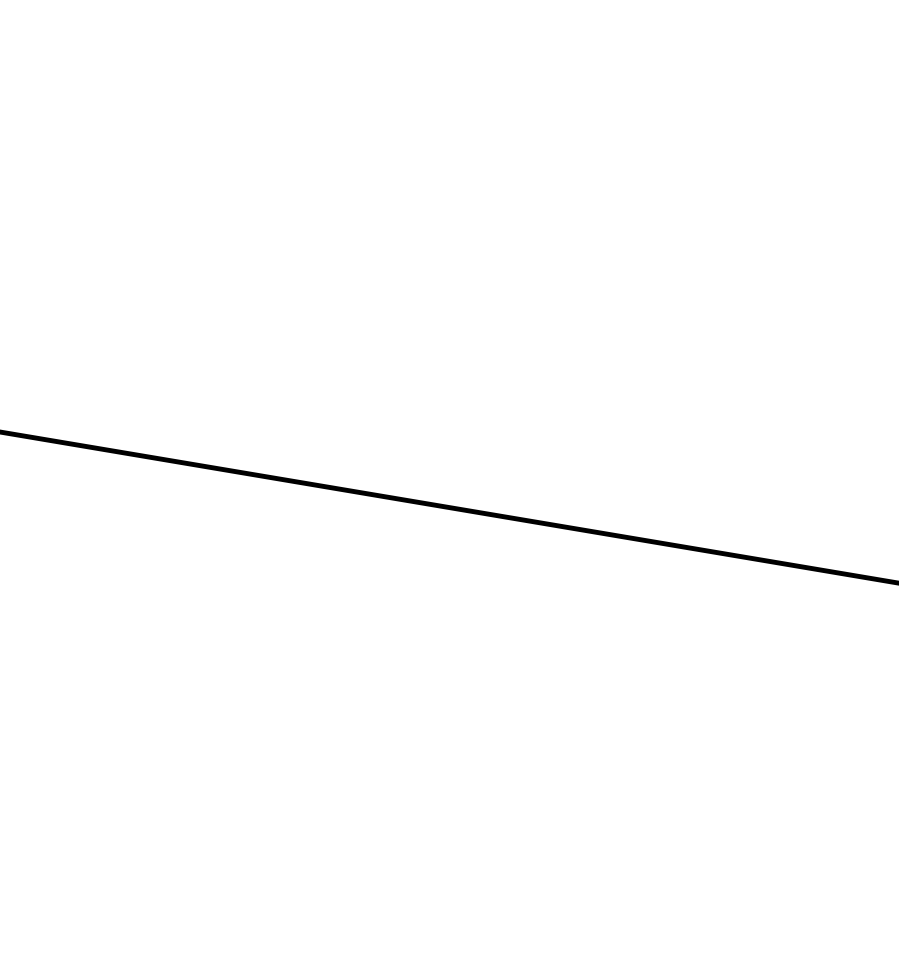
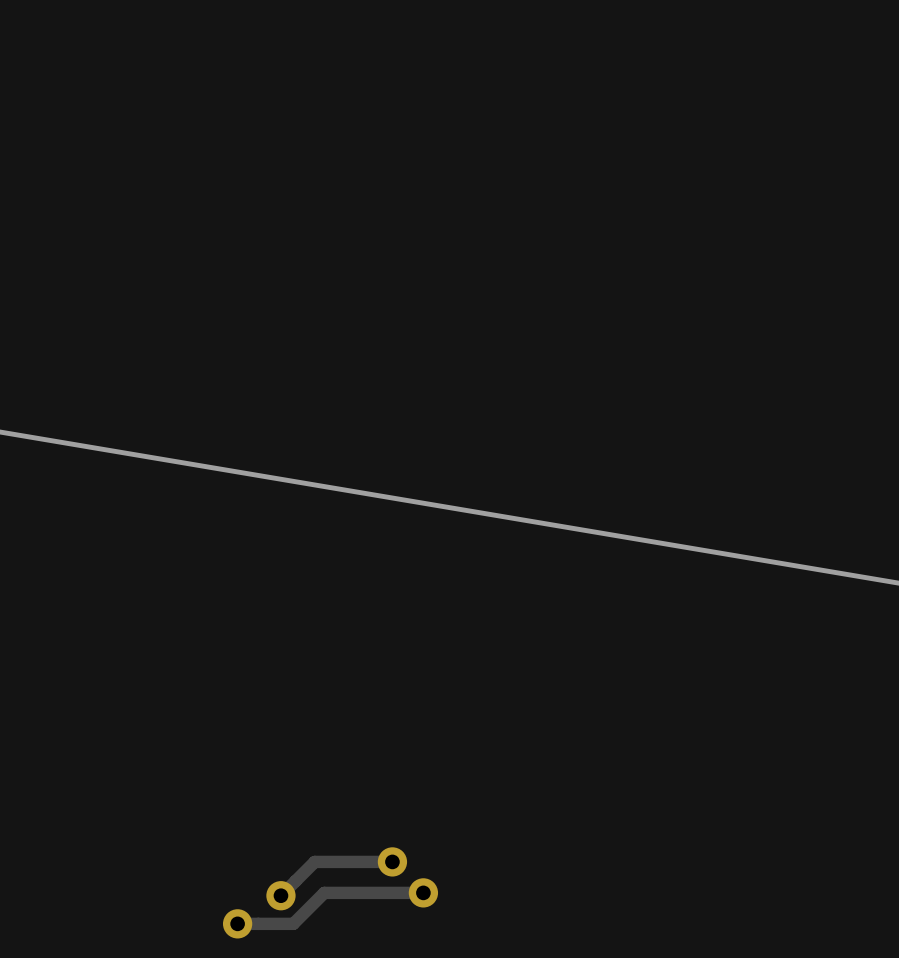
track: none -> (392, 861) (314, 861) (280, 895)
via: none -> (392, 861)
track: none -> (423, 892) (324, 892) (293, 923) (237, 923)
via: none -> (423, 892)
via: none -> (280, 895)
via: none -> (237, 923)

